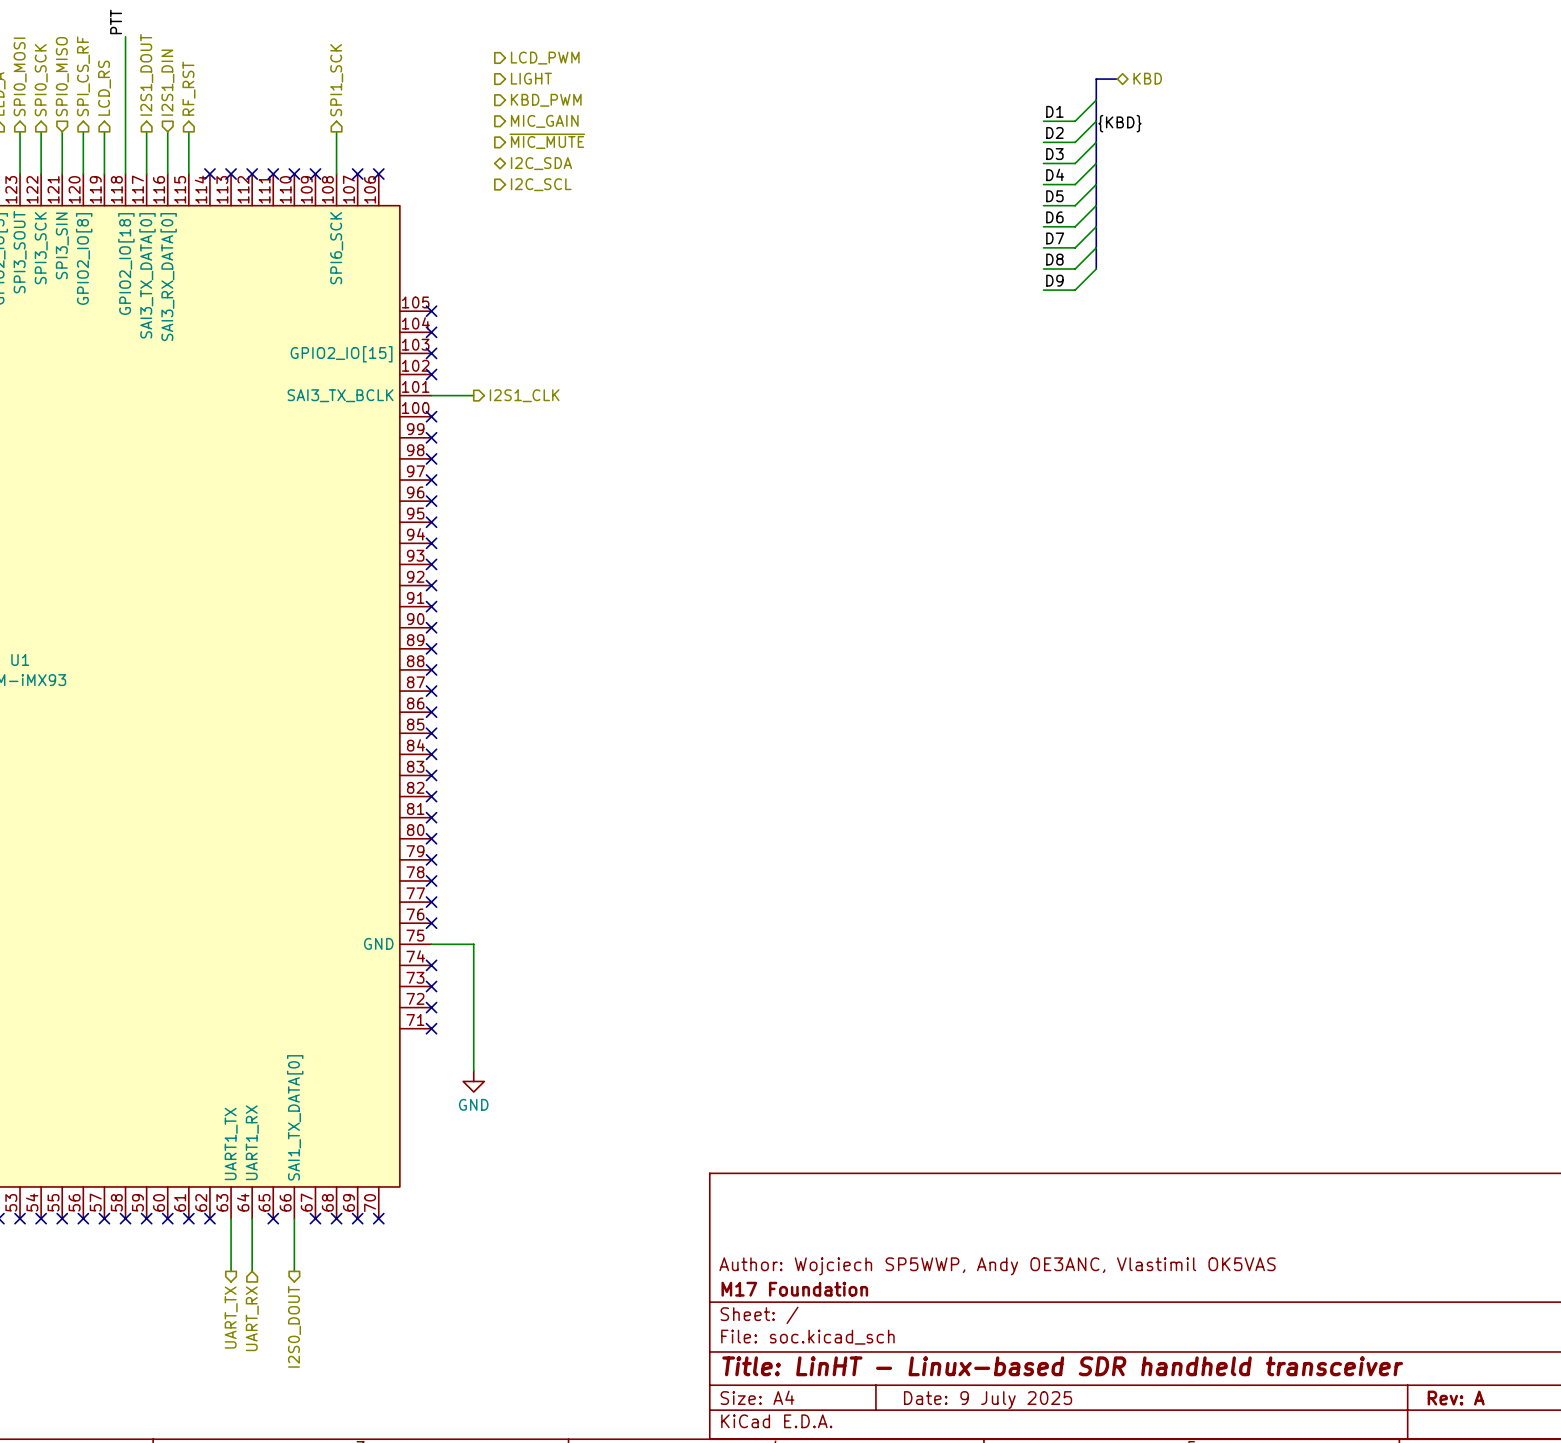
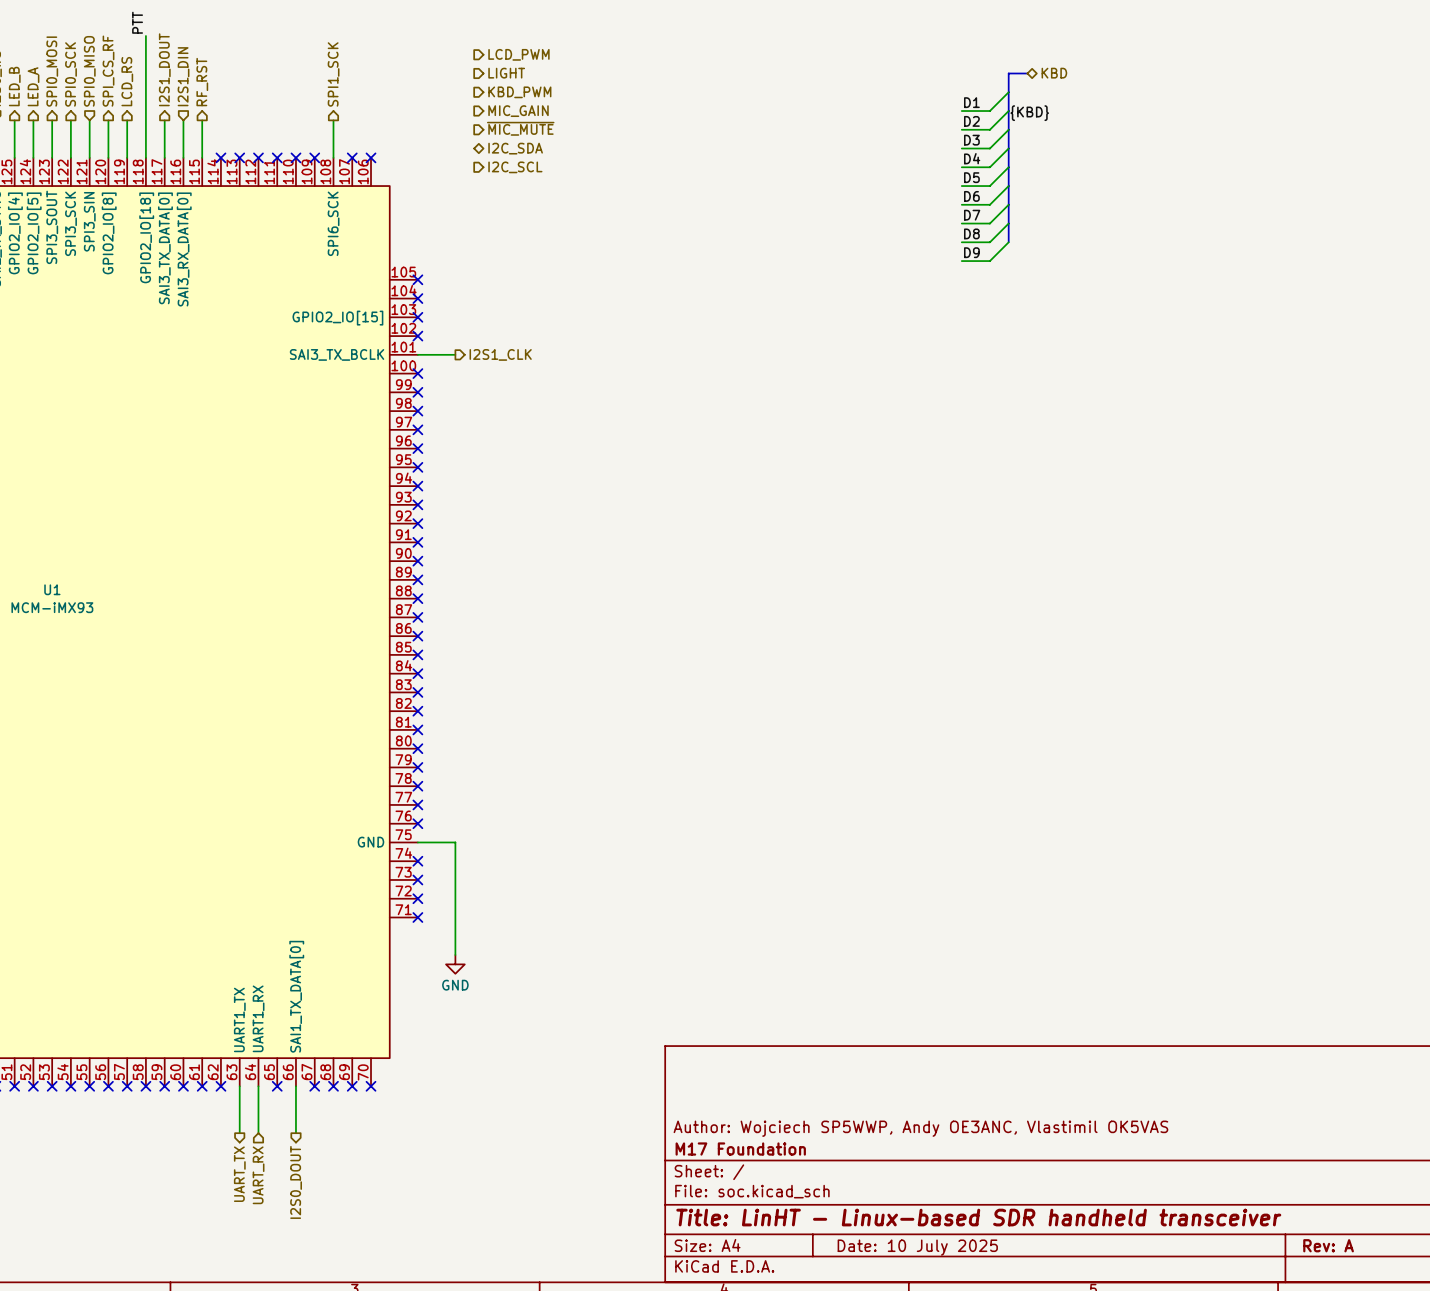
title block: Date: 9 July 2025 (988, 1400) -> Date: 10 July 2025 (917, 1247)

